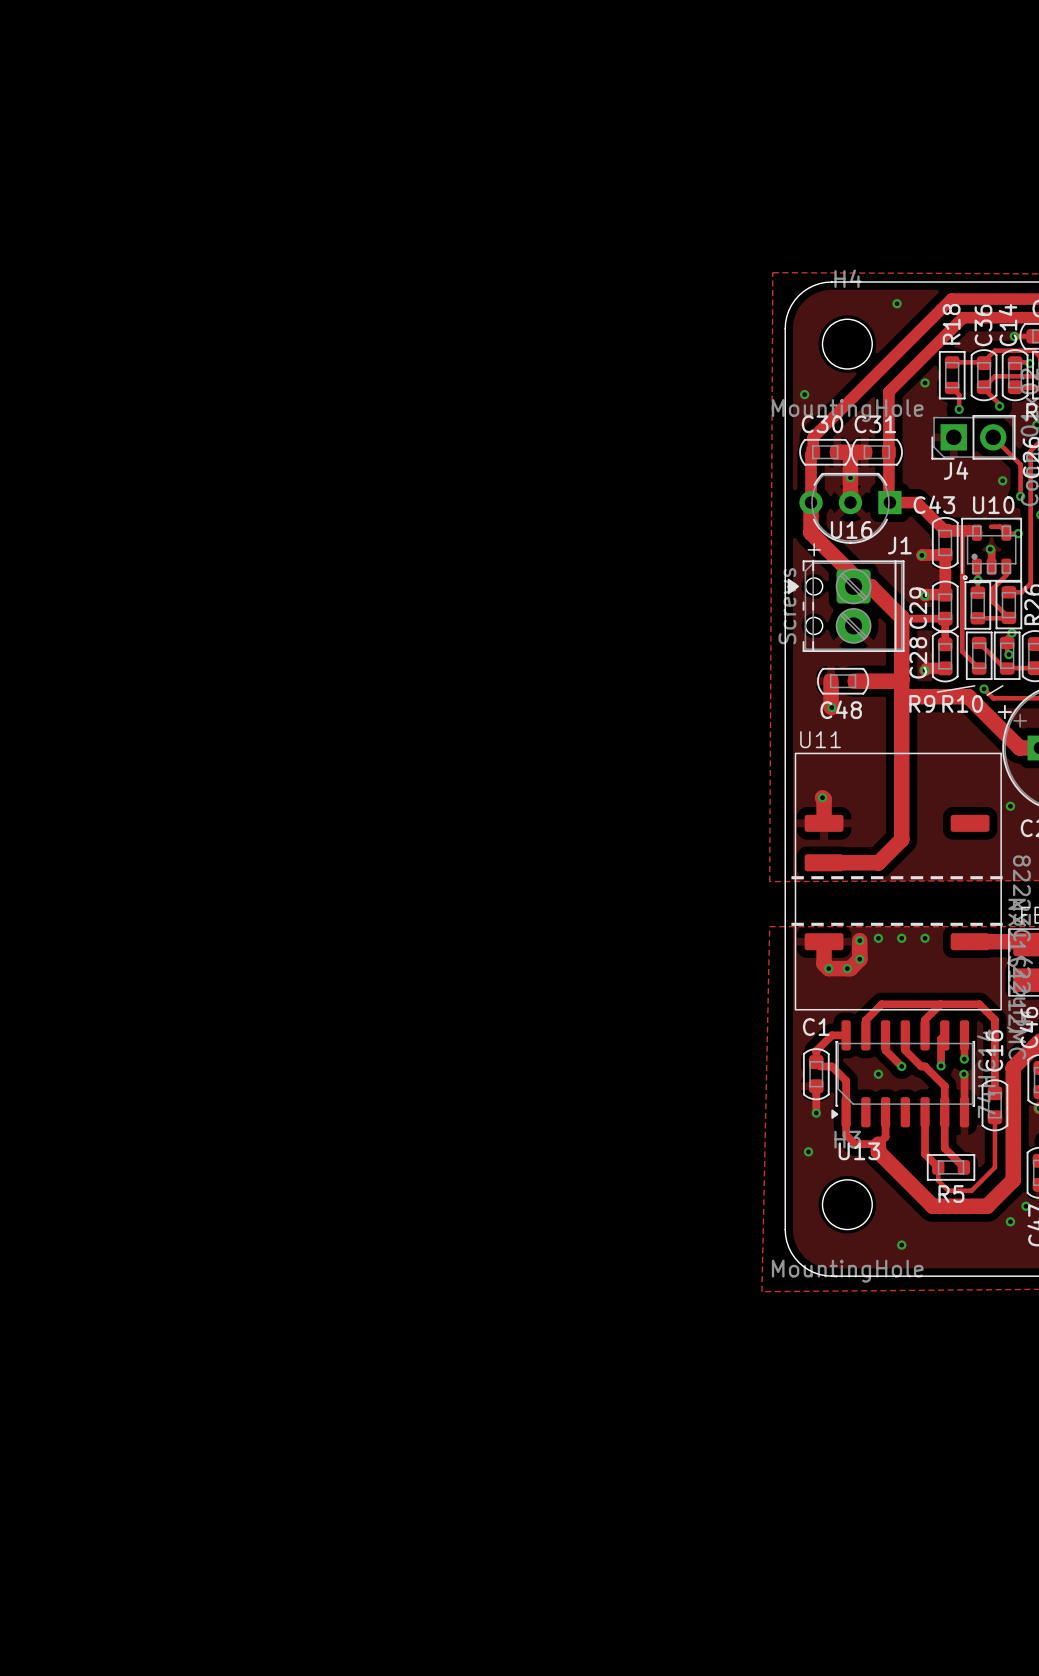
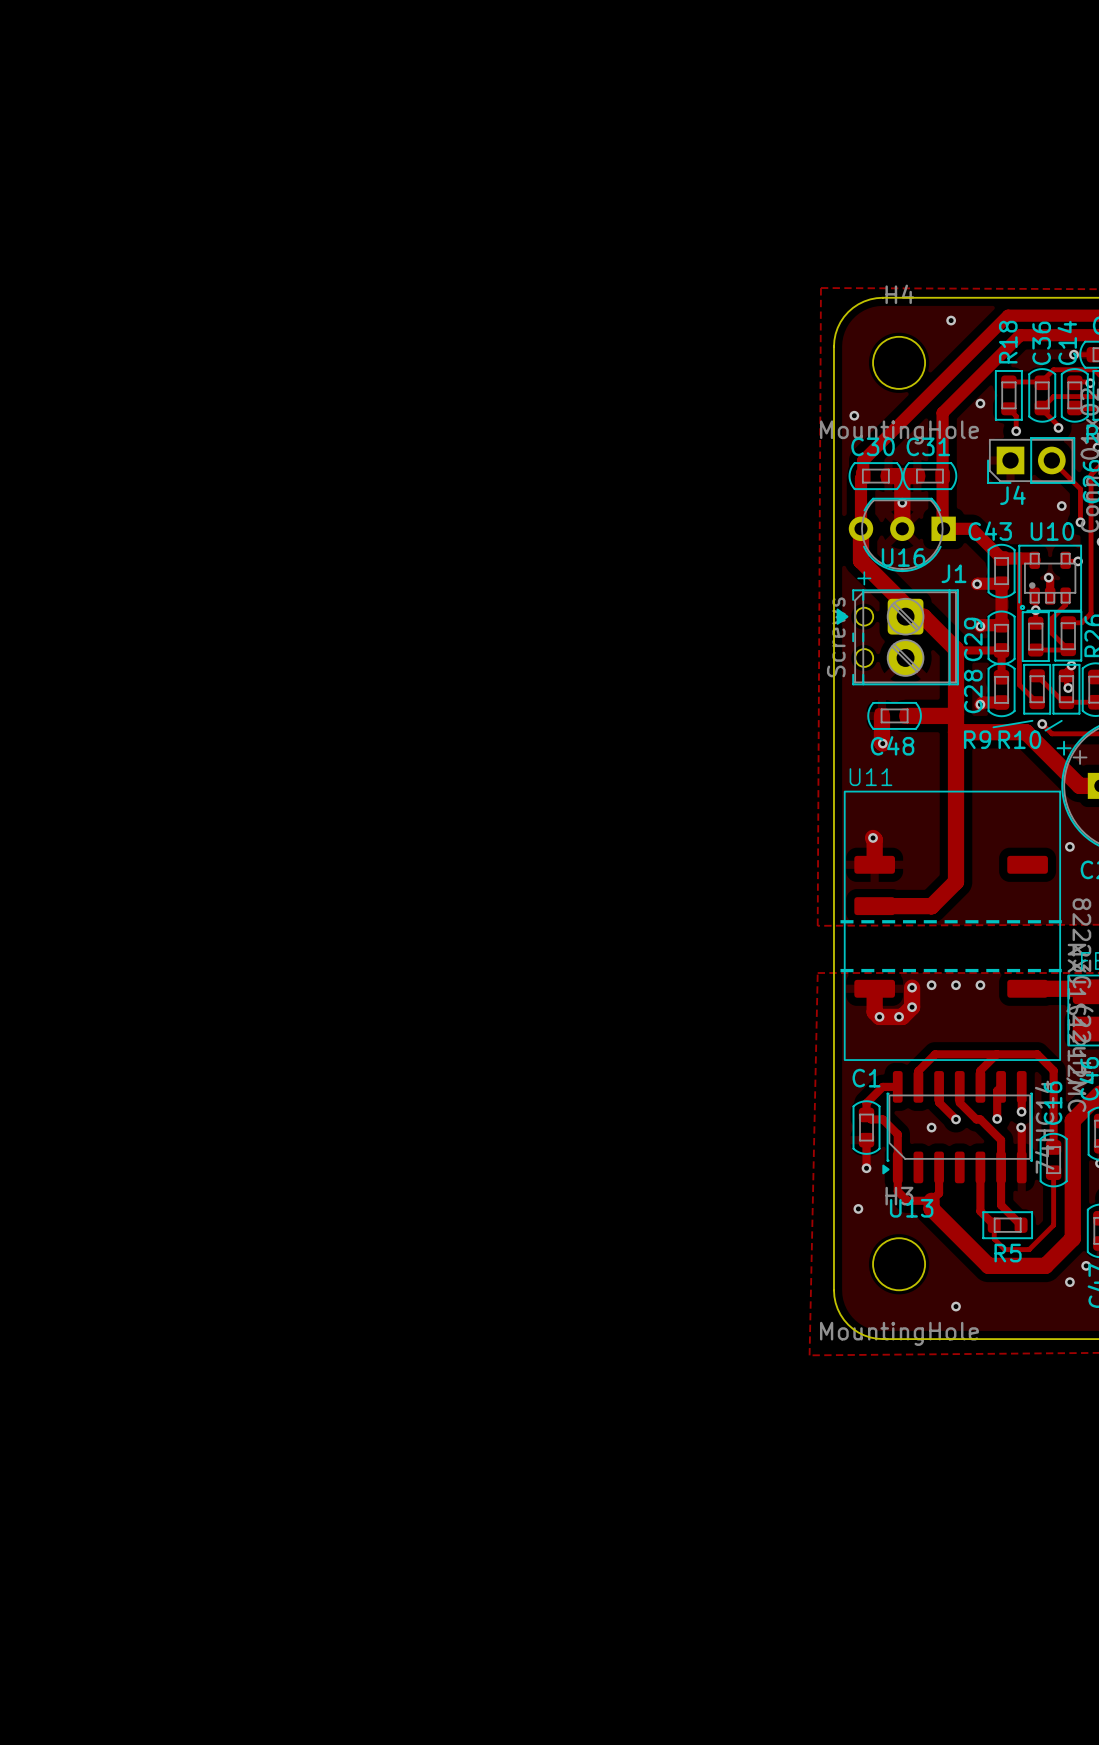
track: (991, 526) (1000, 526) (1006, 532) -> none

